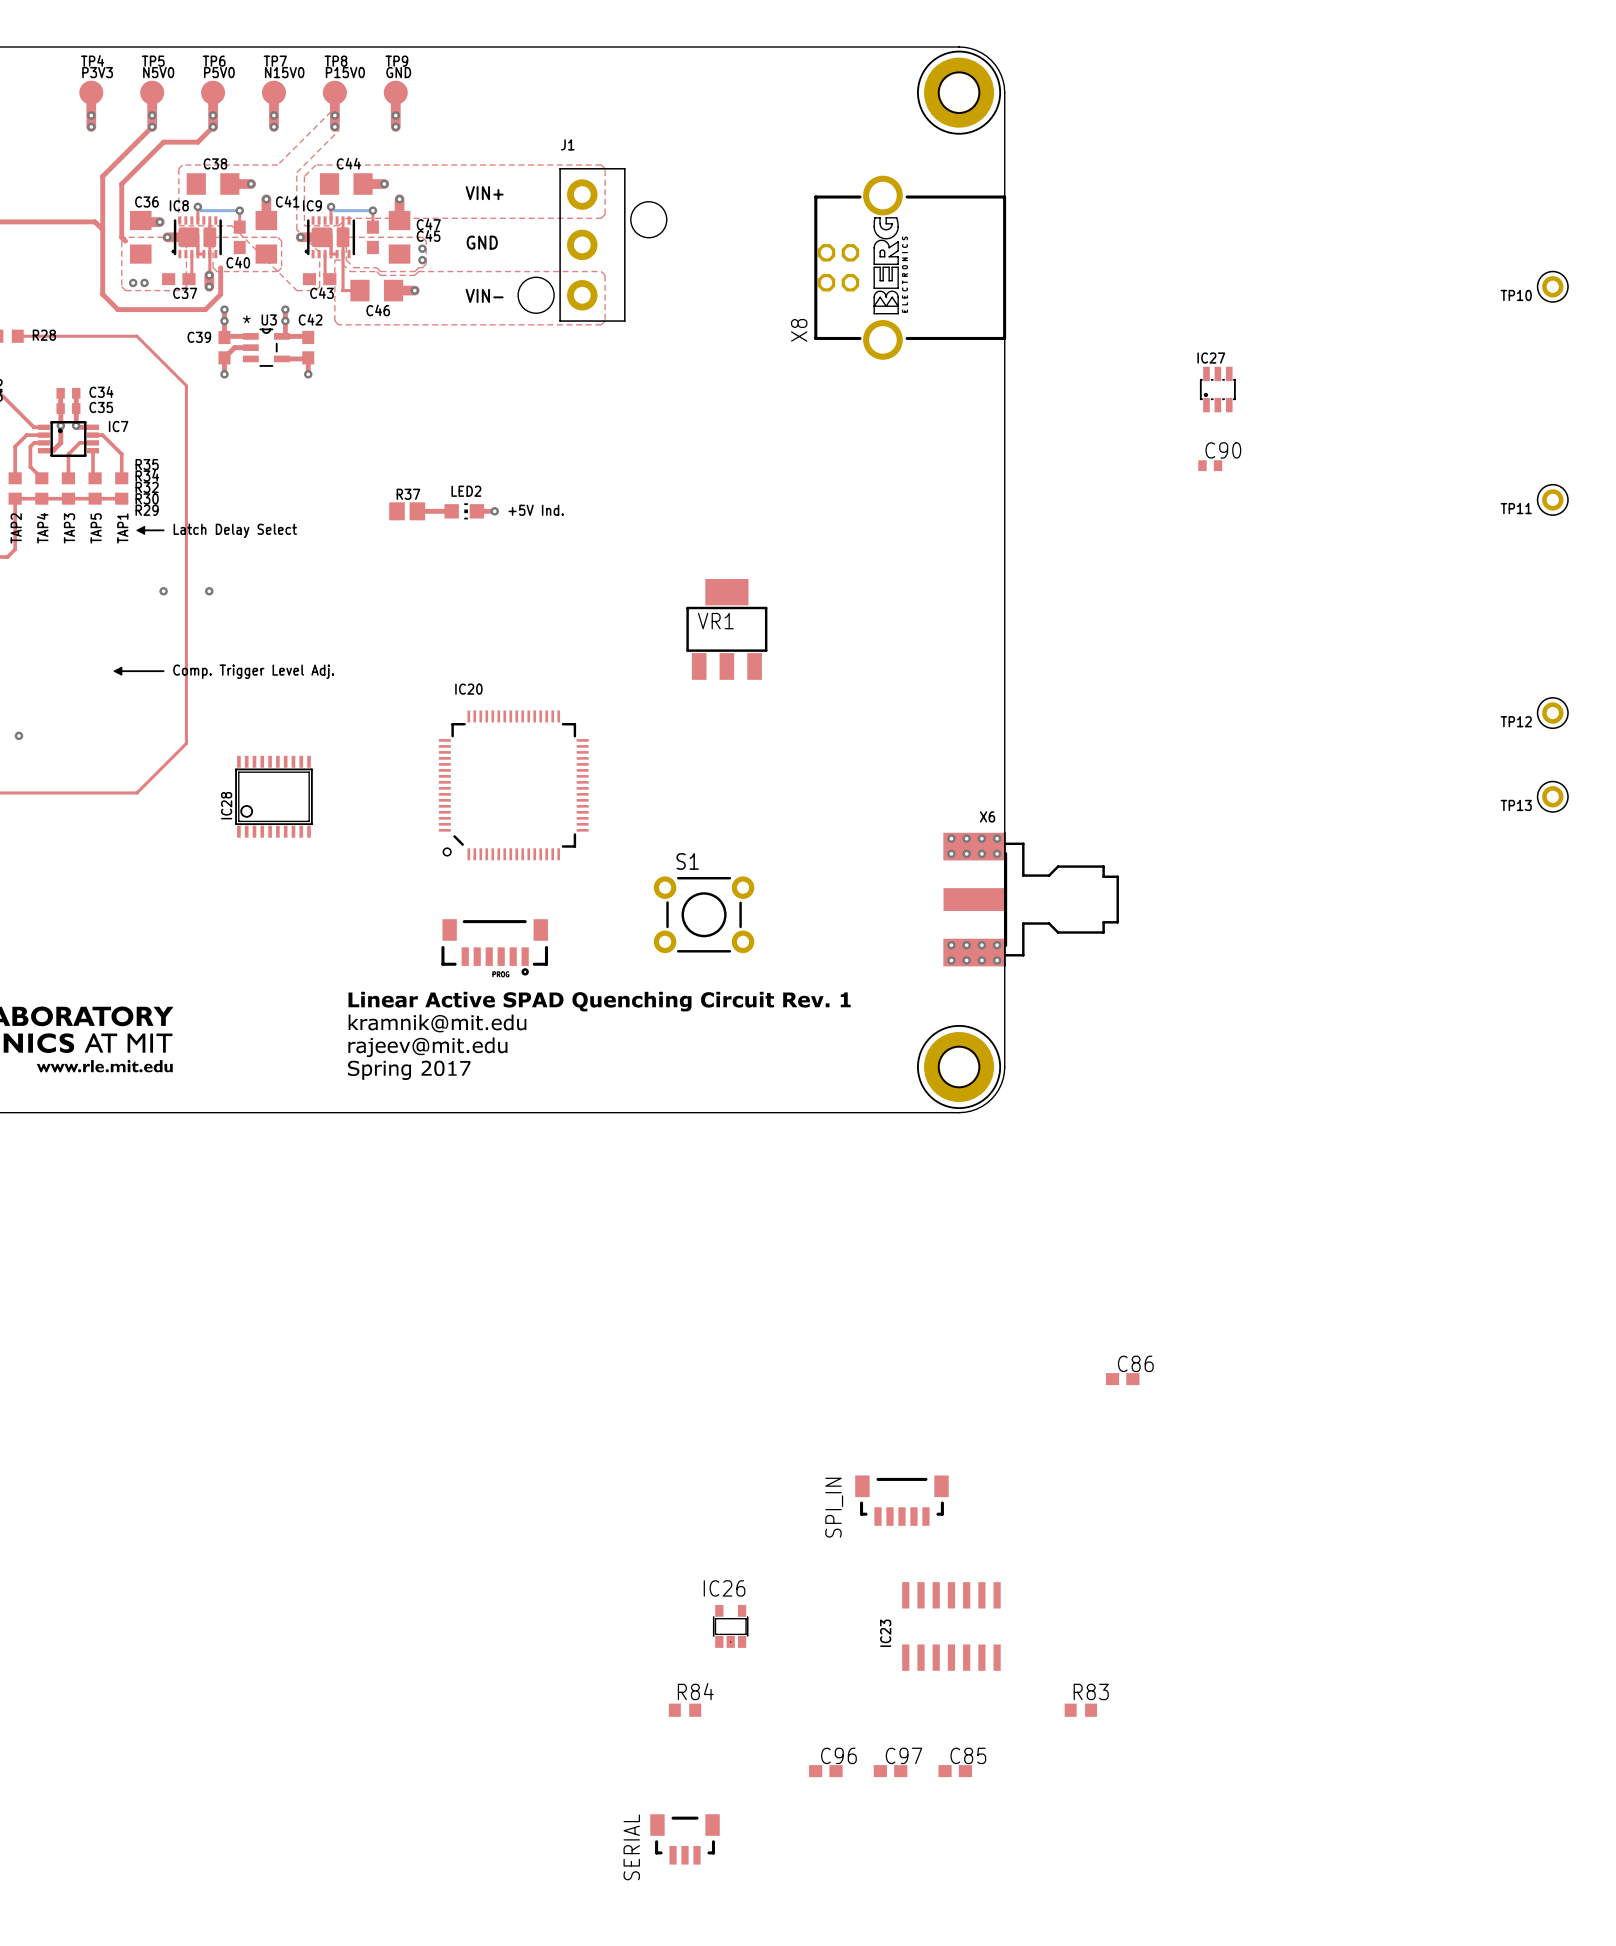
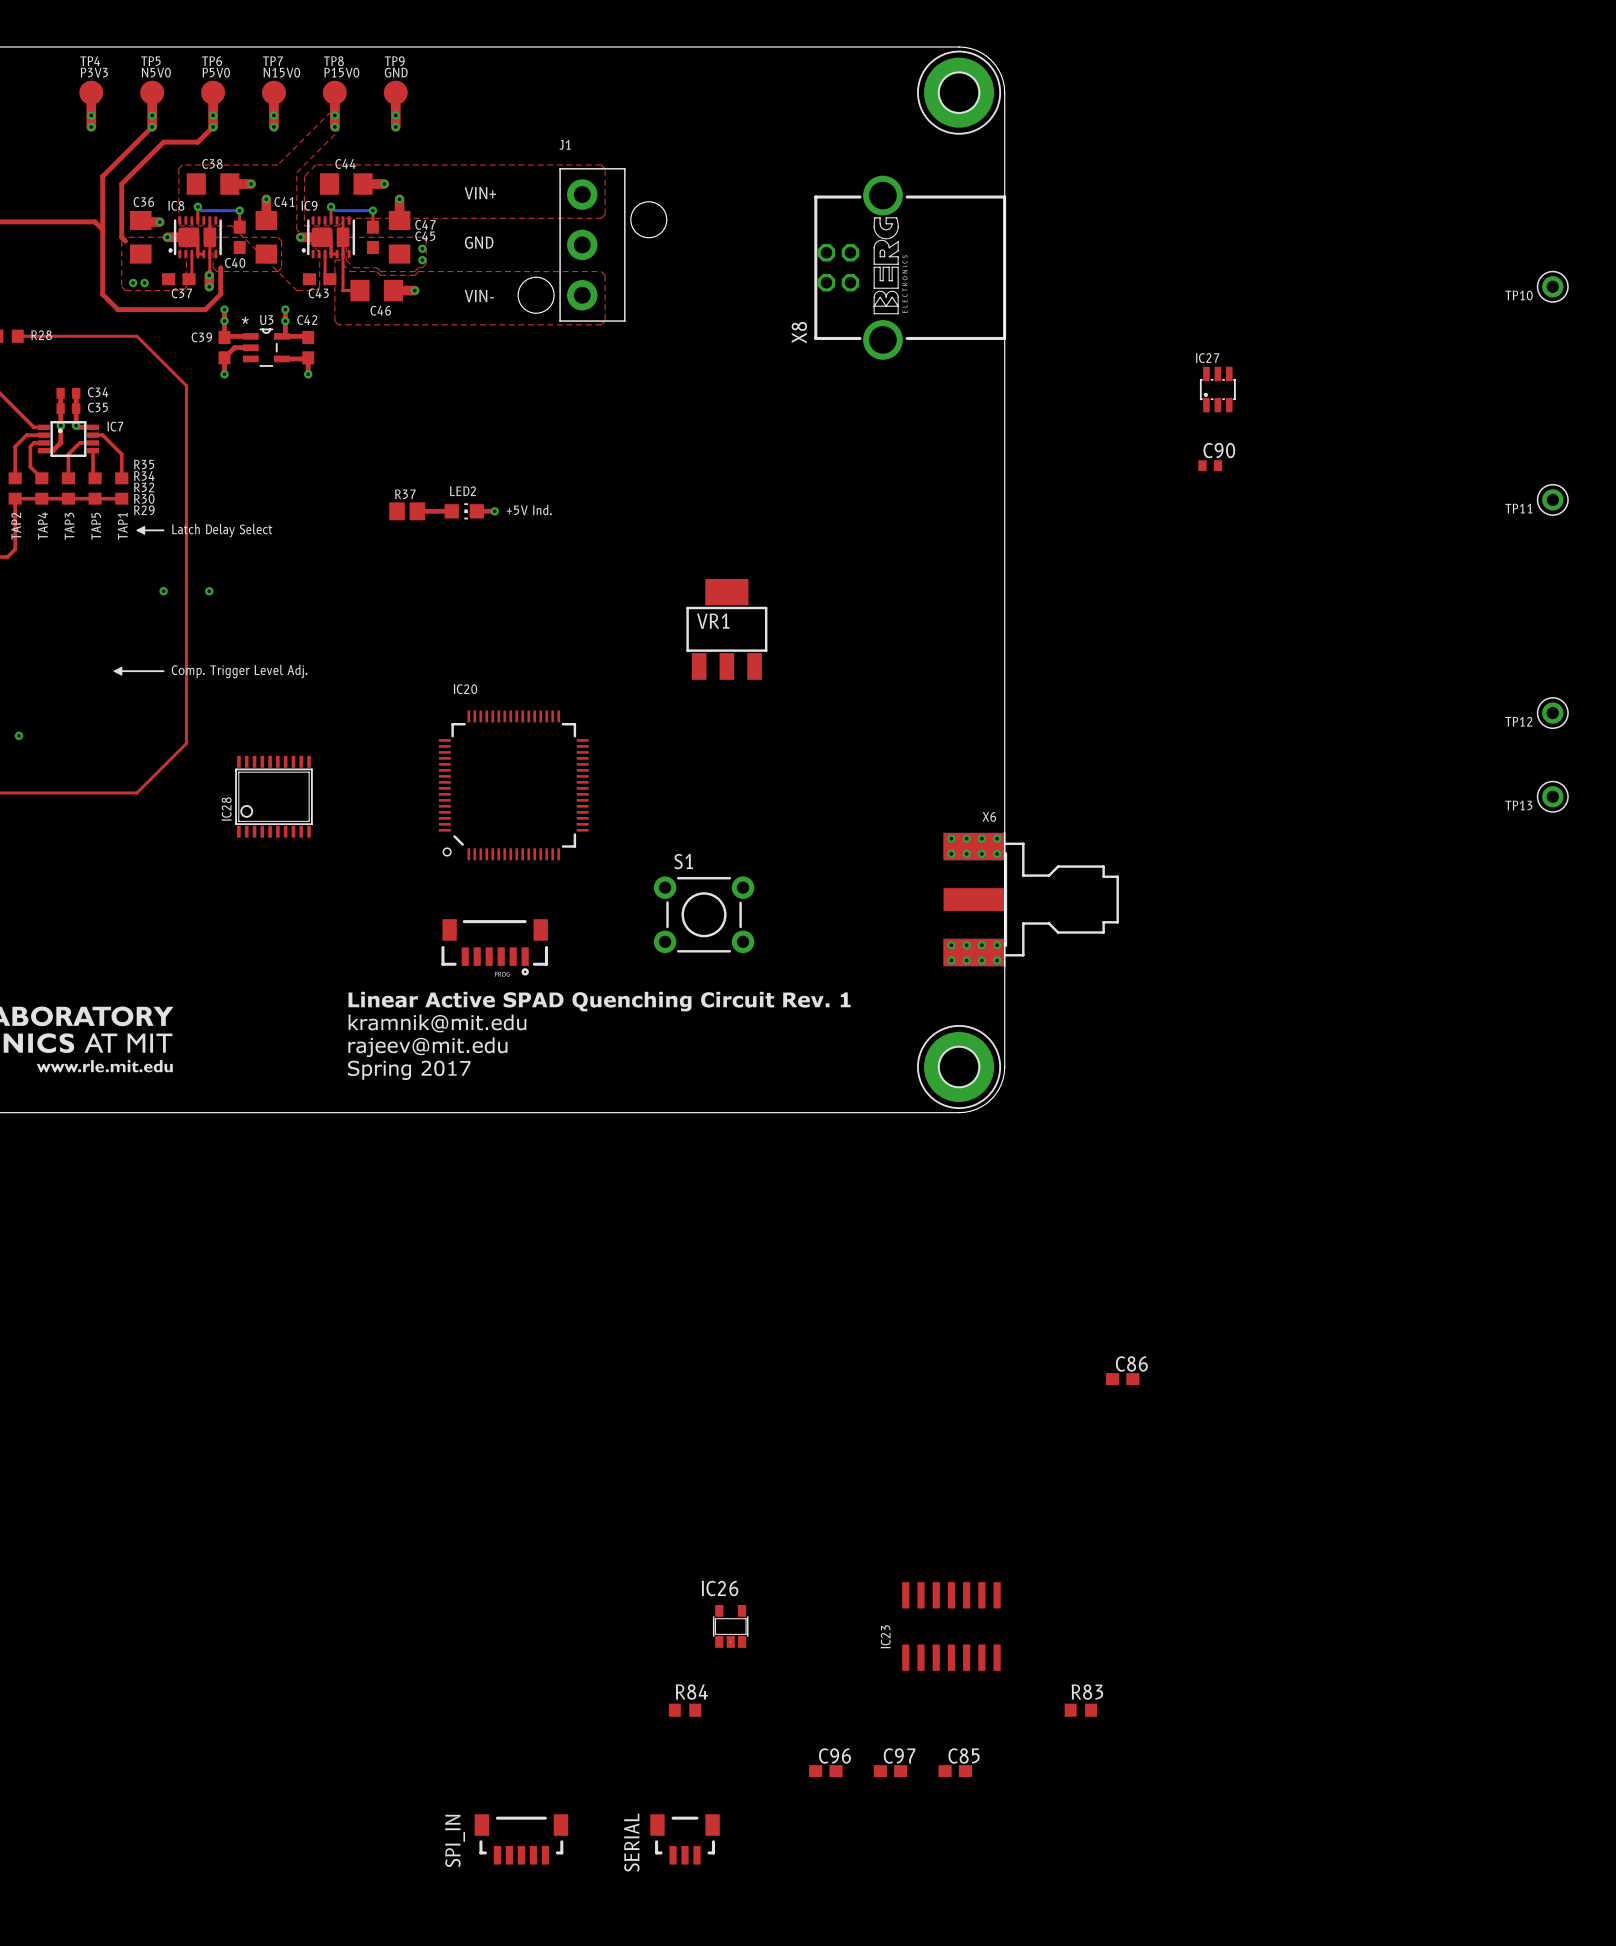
SPI_IN: (901, 1500) -> none
SPI_IN: none -> (521, 1839)

